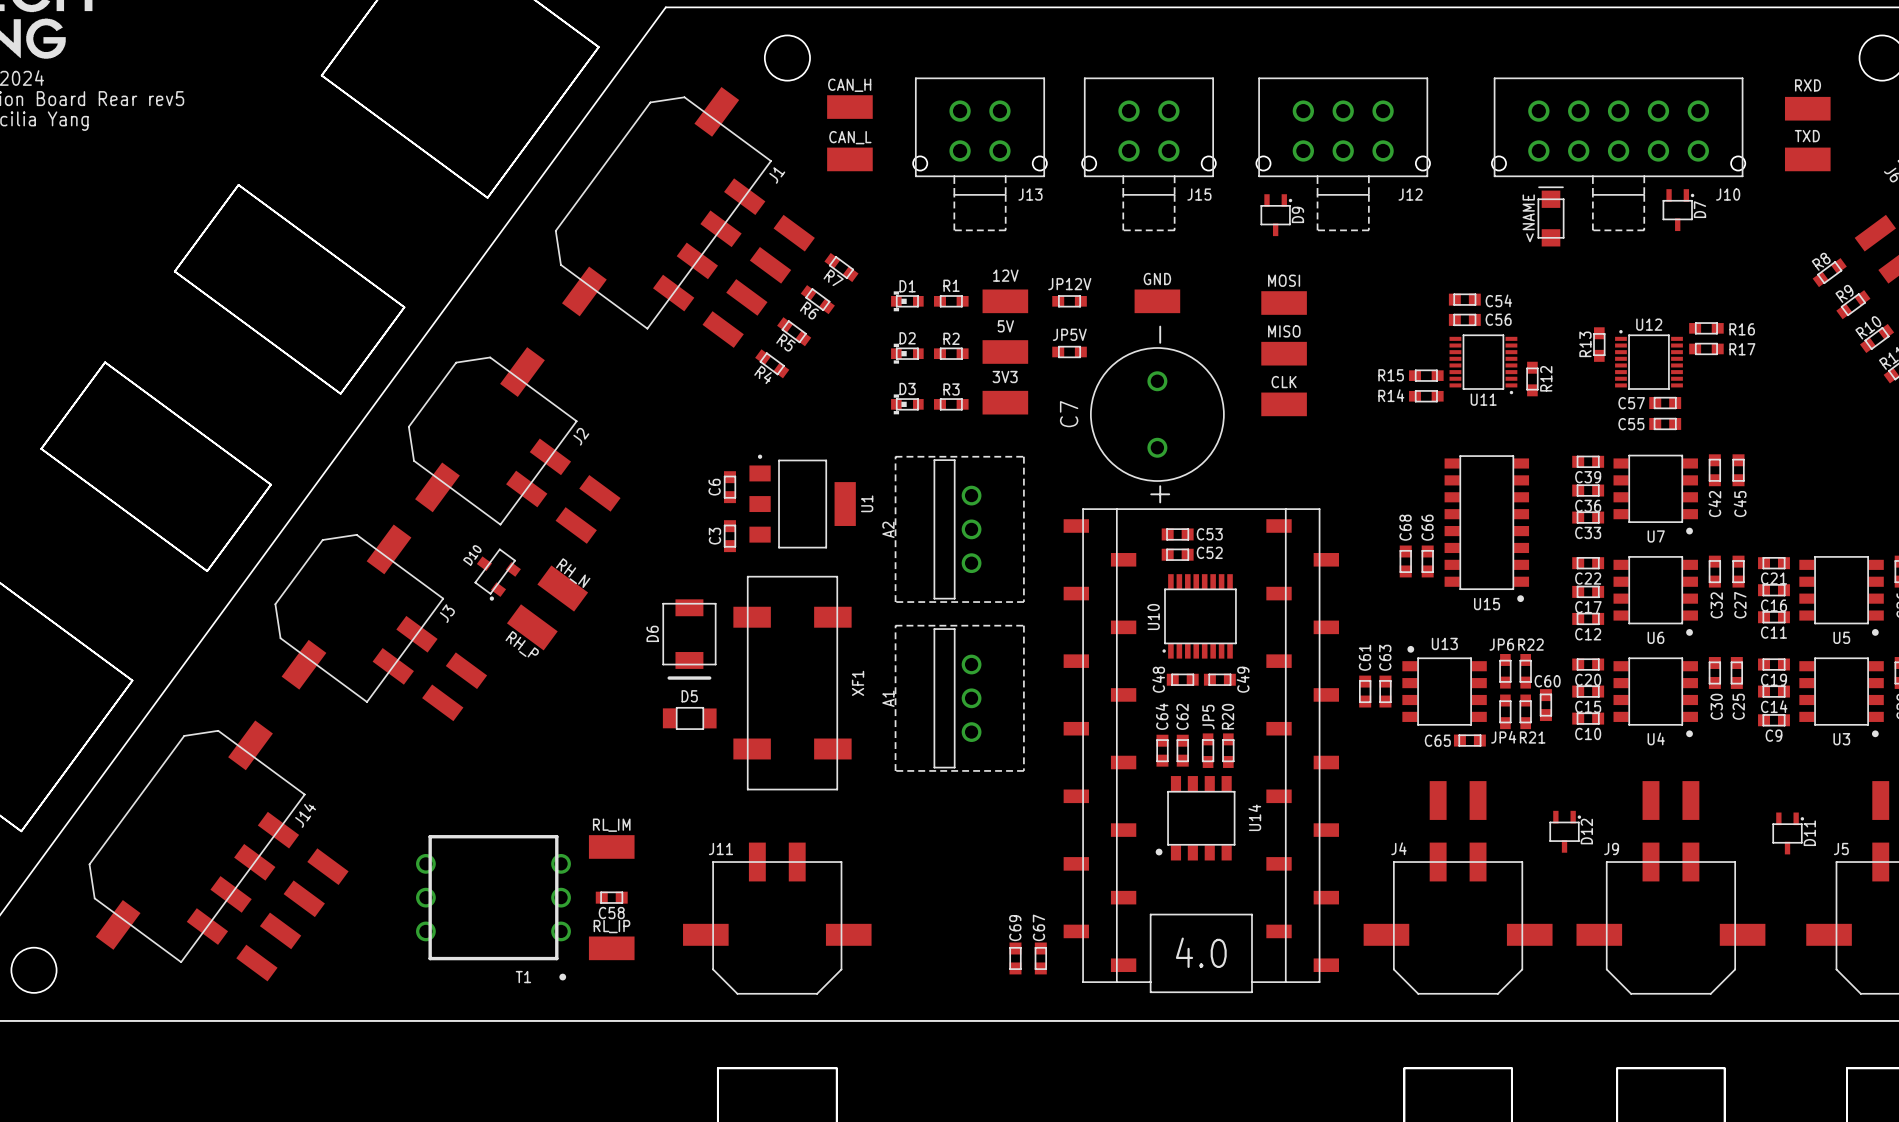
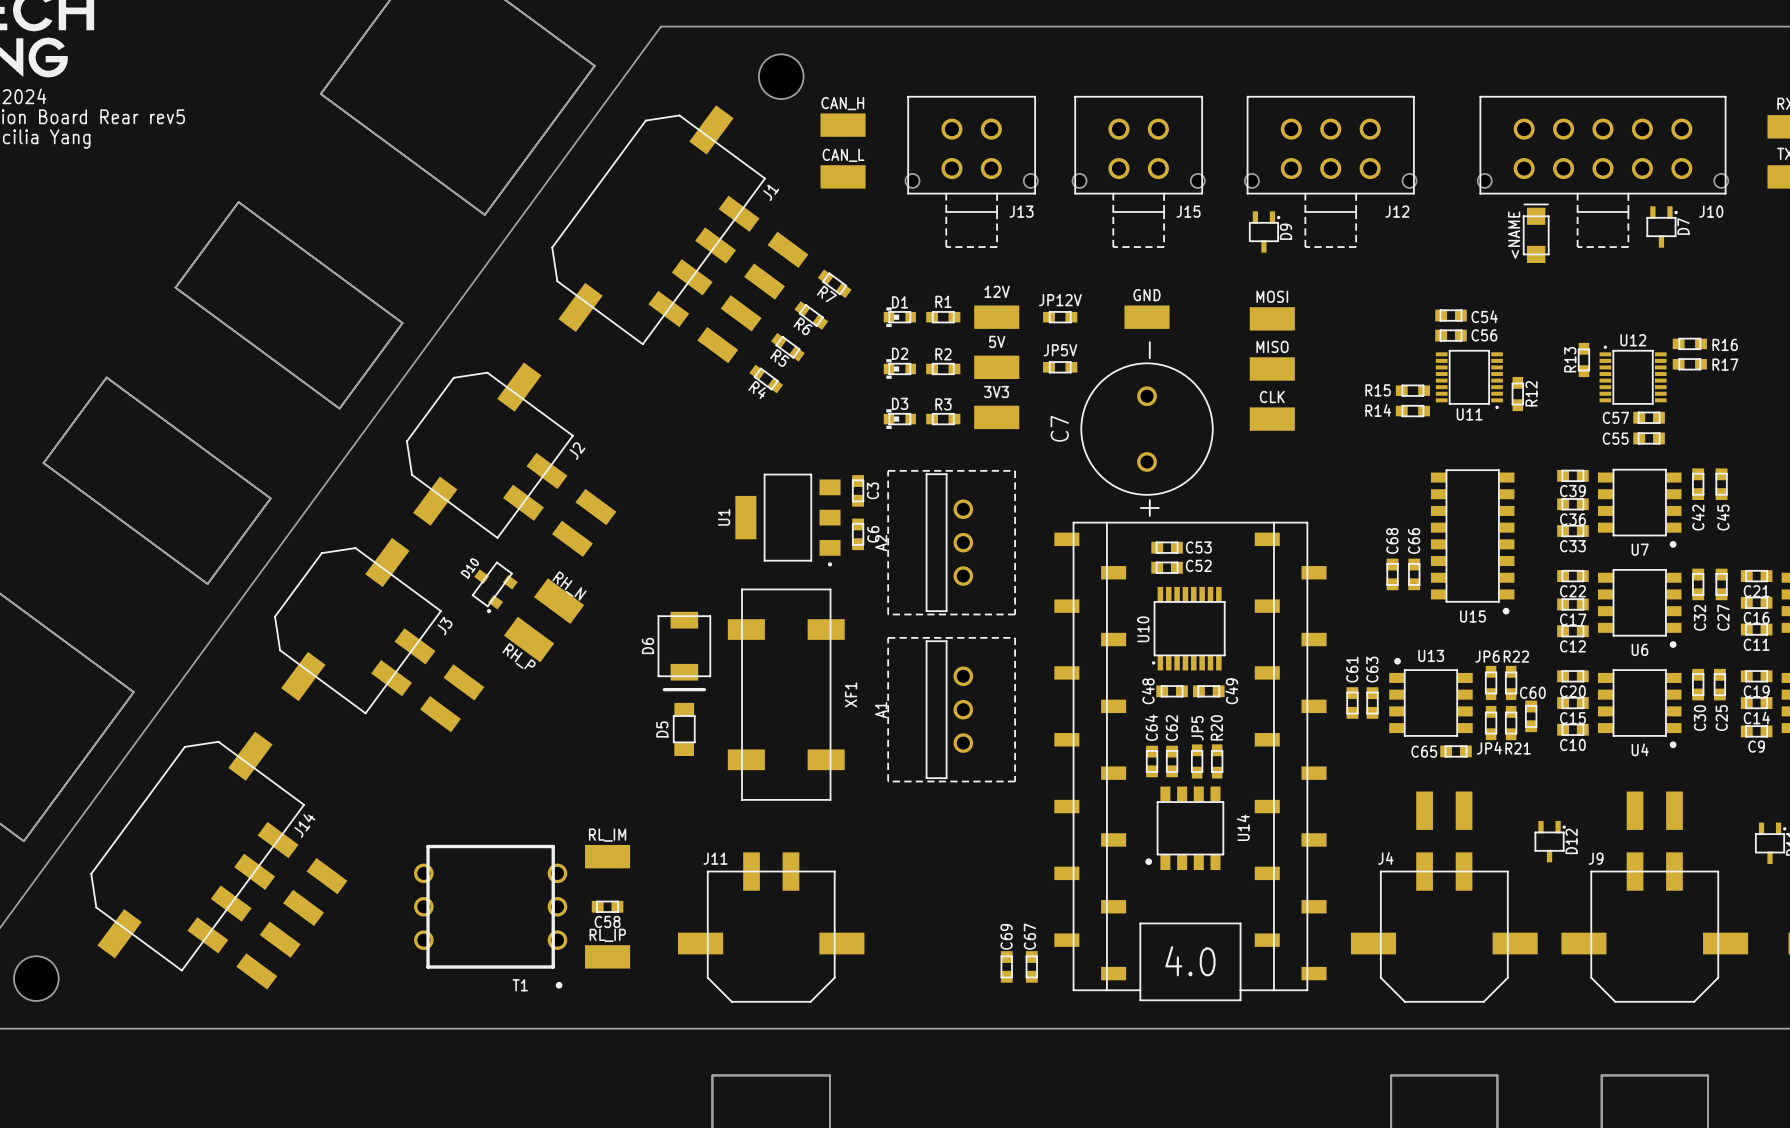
C6 name position: C6 (714, 487) -> C6 (873, 534)
C6 position: (729, 487) -> (858, 534)
U1 rotation: 0° (802, 501) -> 180° (787, 520)
C3 name position: C3 (714, 536) -> C3 (872, 490)
C3 position: (729, 536) -> (858, 490)
D5 rotation: 0° (689, 718) -> 90° counterclockwise (684, 729)

